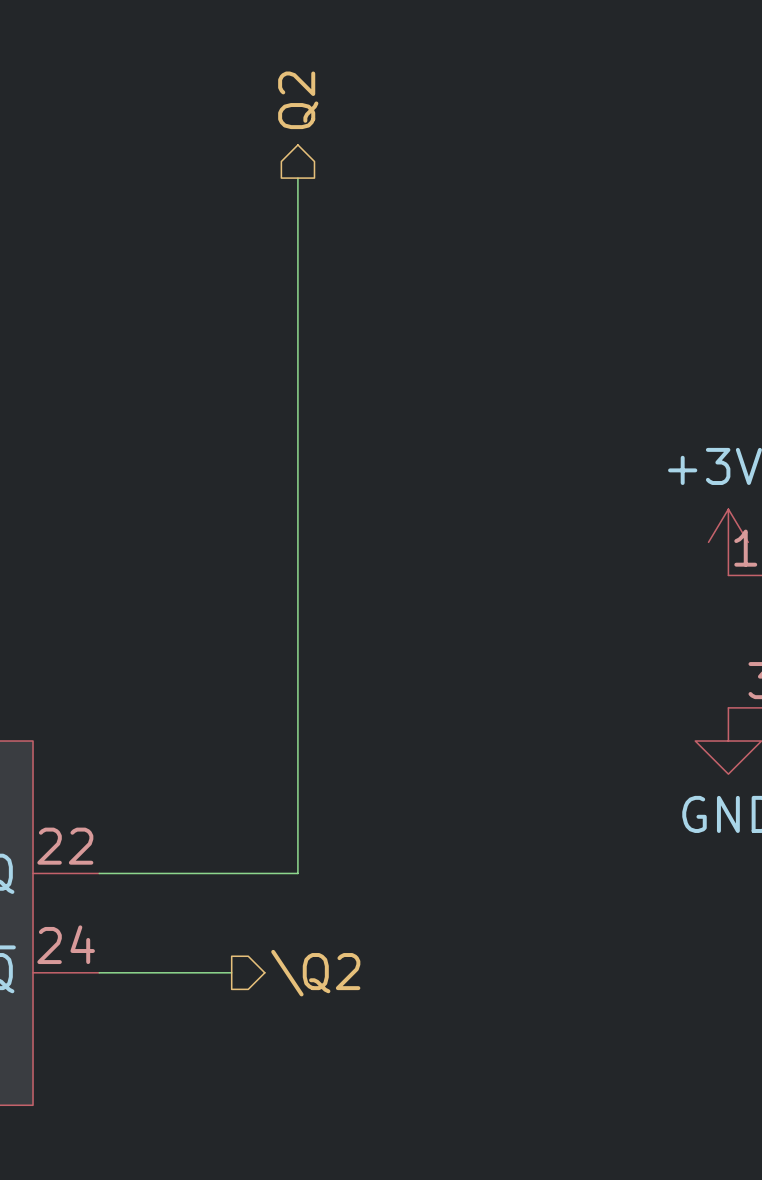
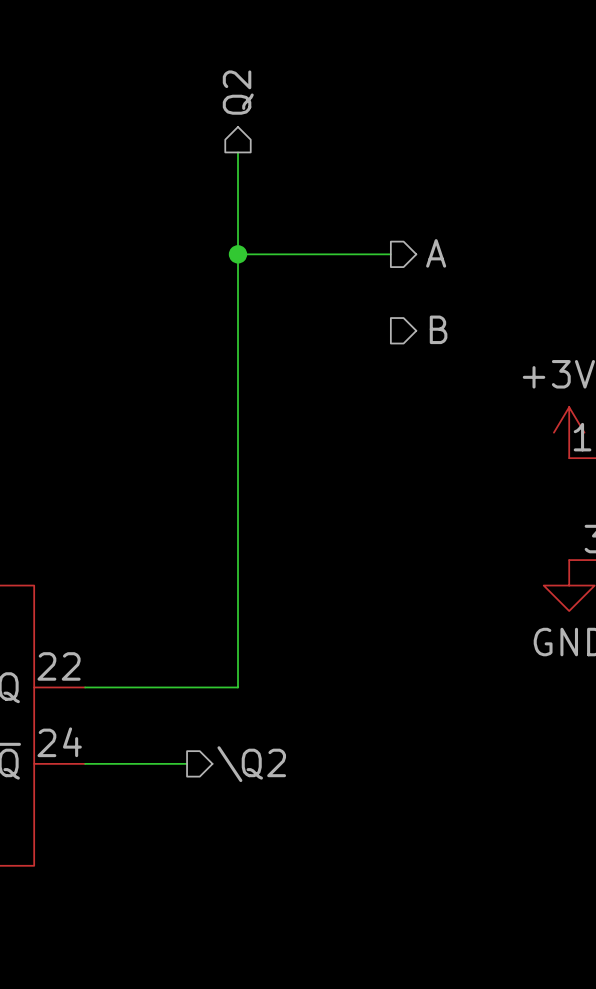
sheet pin: none -> A (436, 253)
wire: none -> (238, 254) (390, 254)
junction: none -> (238, 254)
sheet pin: none -> B (438, 329)

